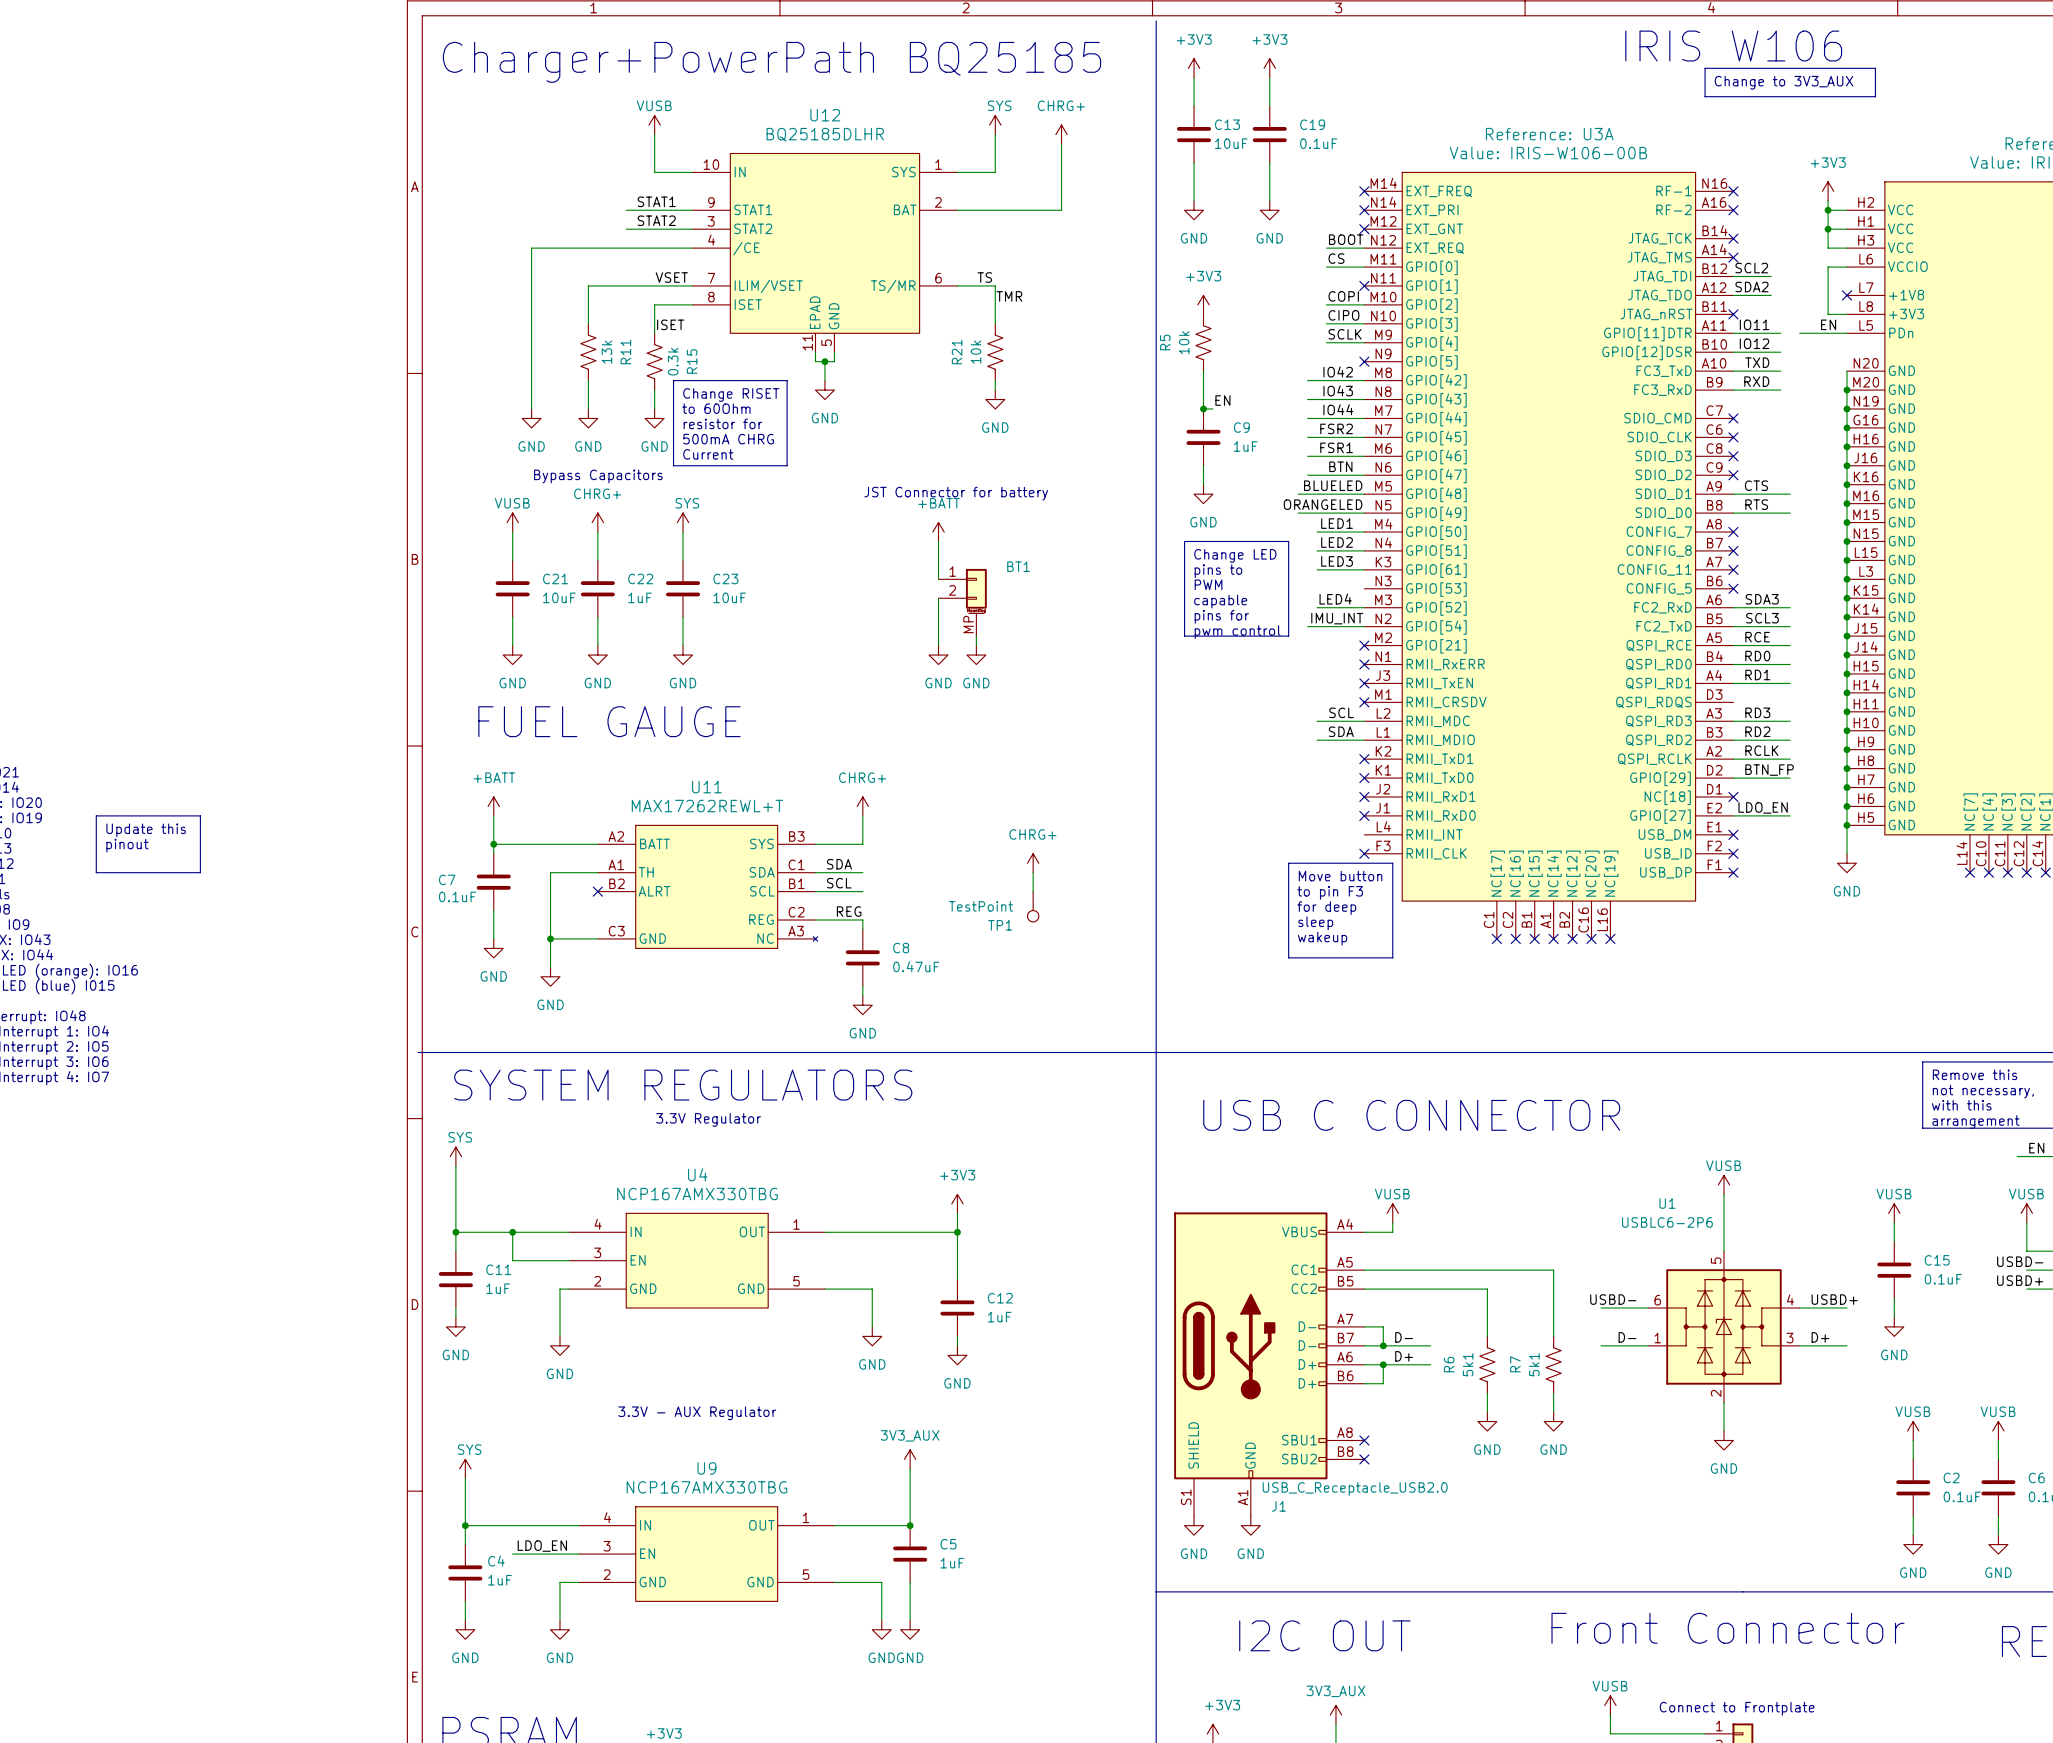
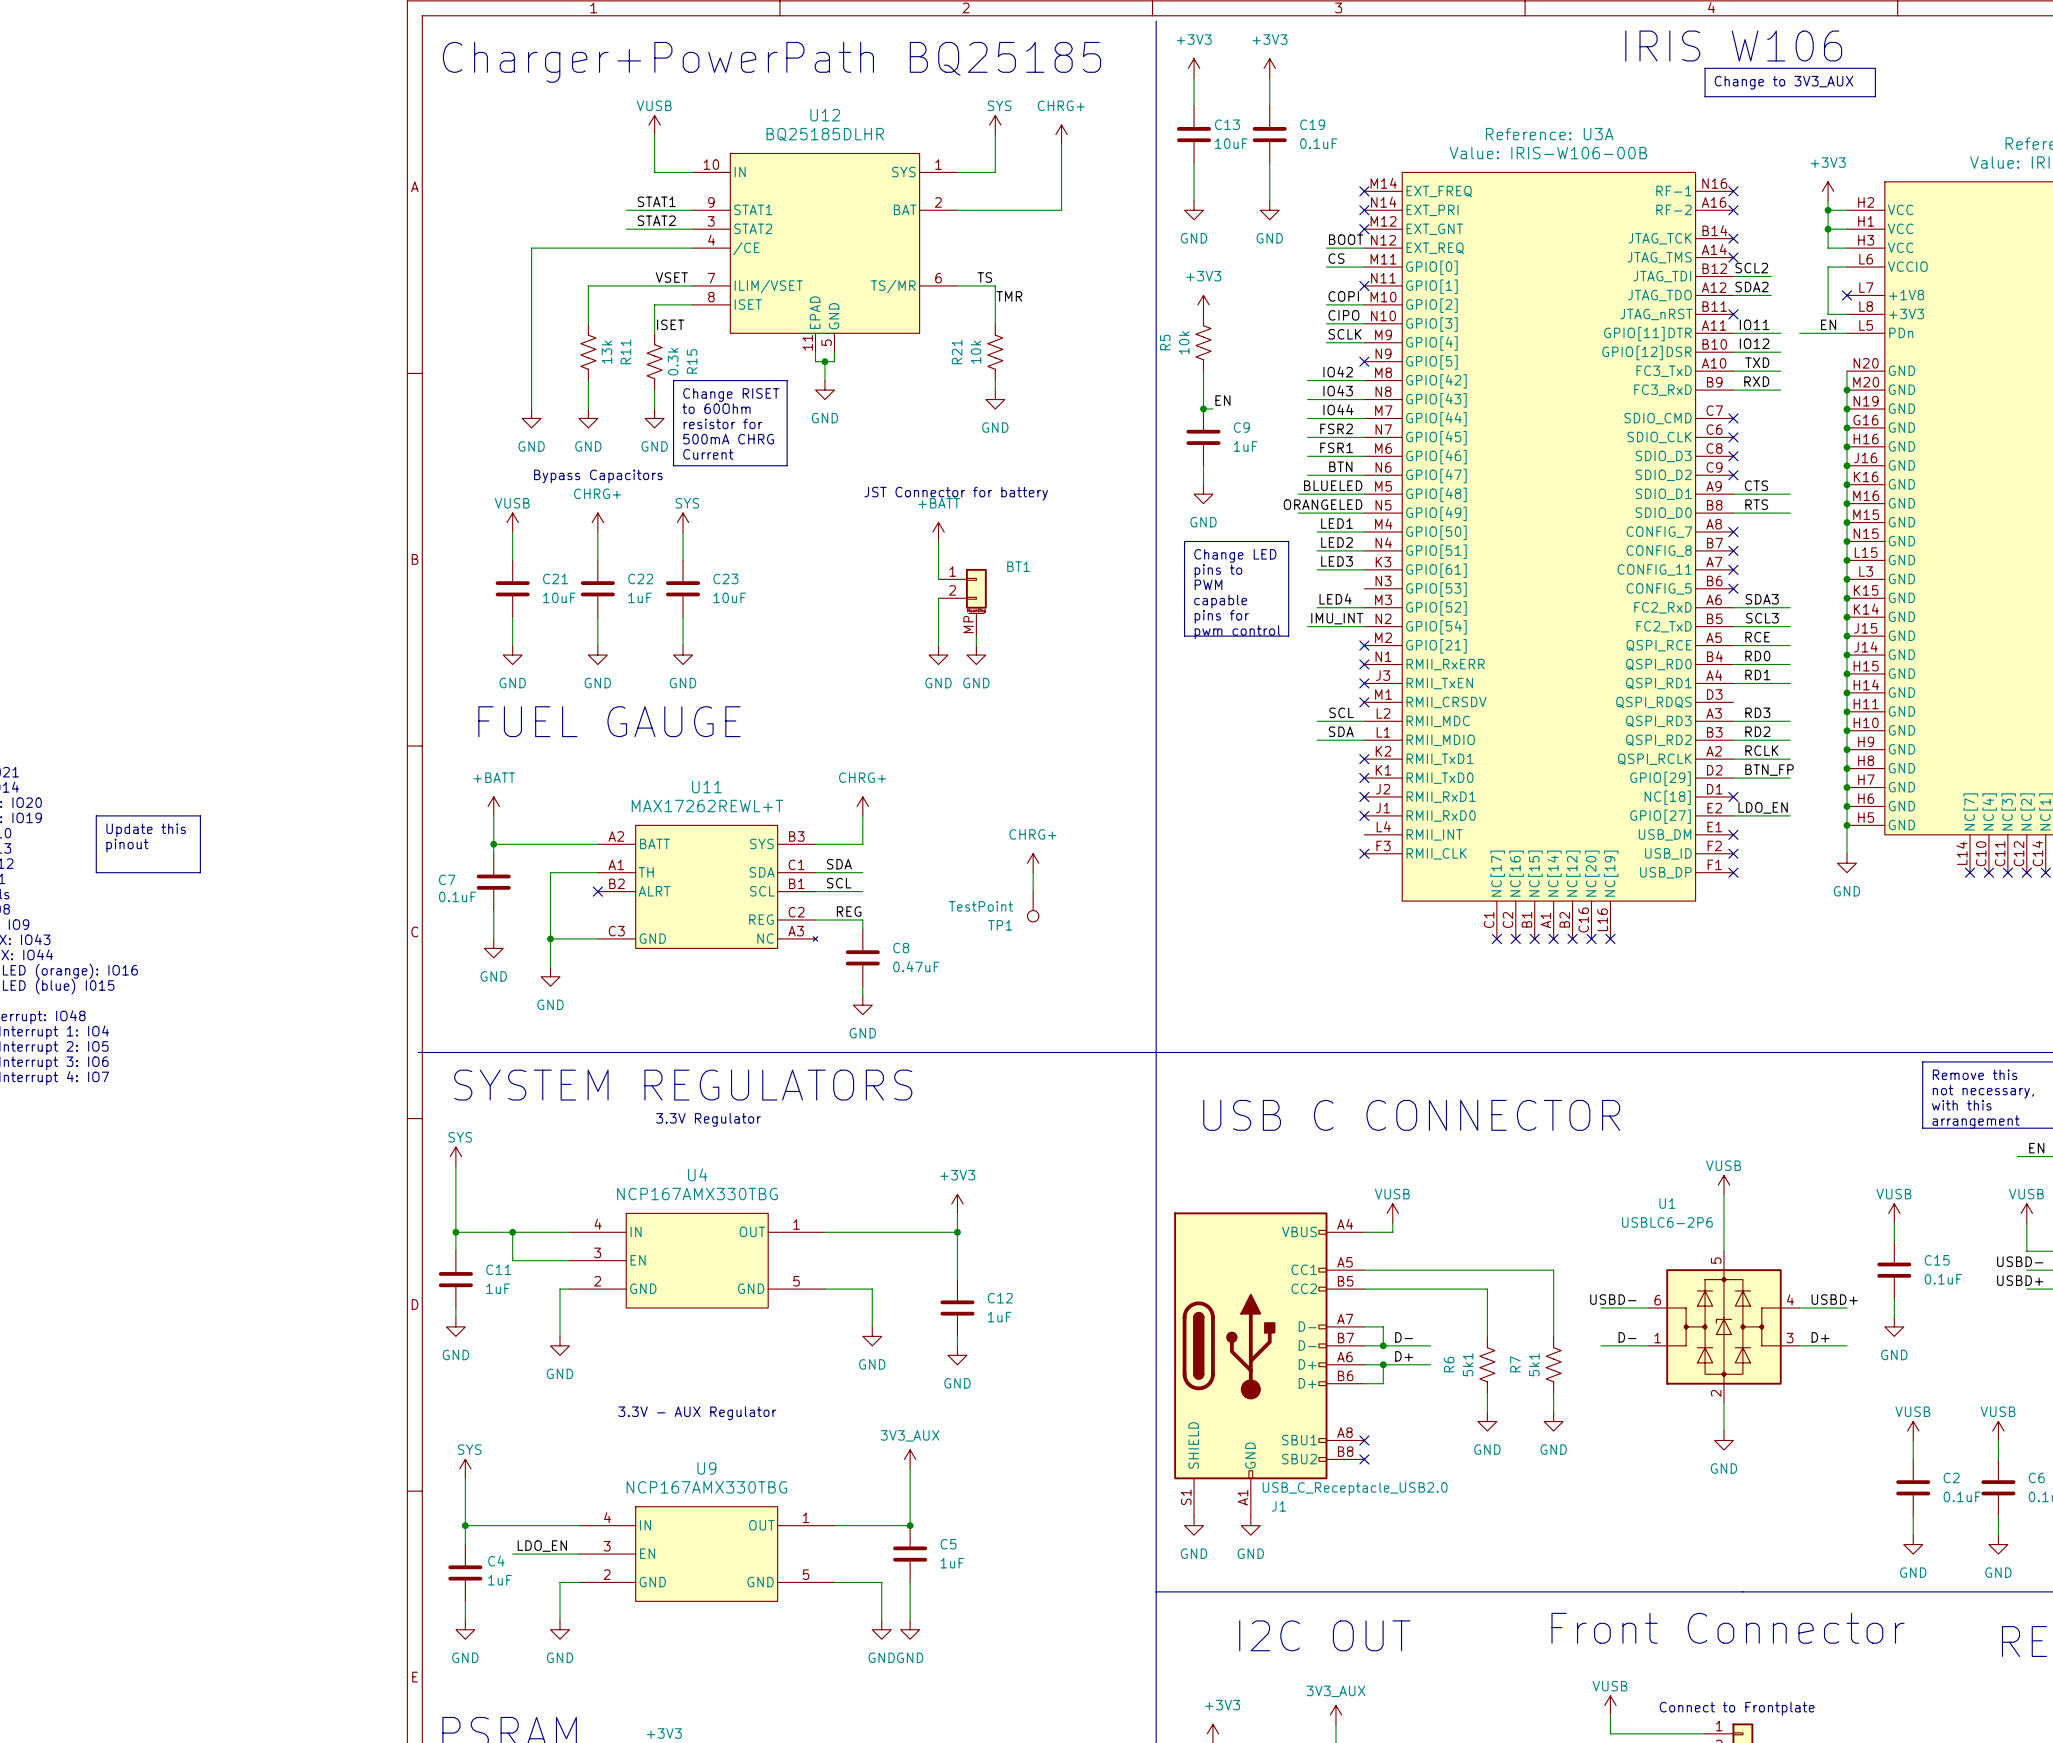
line: (1288, 863) (1392, 863) (1392, 957) (1288, 957) (1288, 863) -> none
text: Move button (1340, 876) -> none
text: to pin F3 (1330, 892) -> none
text: for deep (1326, 908) -> none
text: sleep (1315, 923) -> none
text: wakeup (1322, 938) -> none

